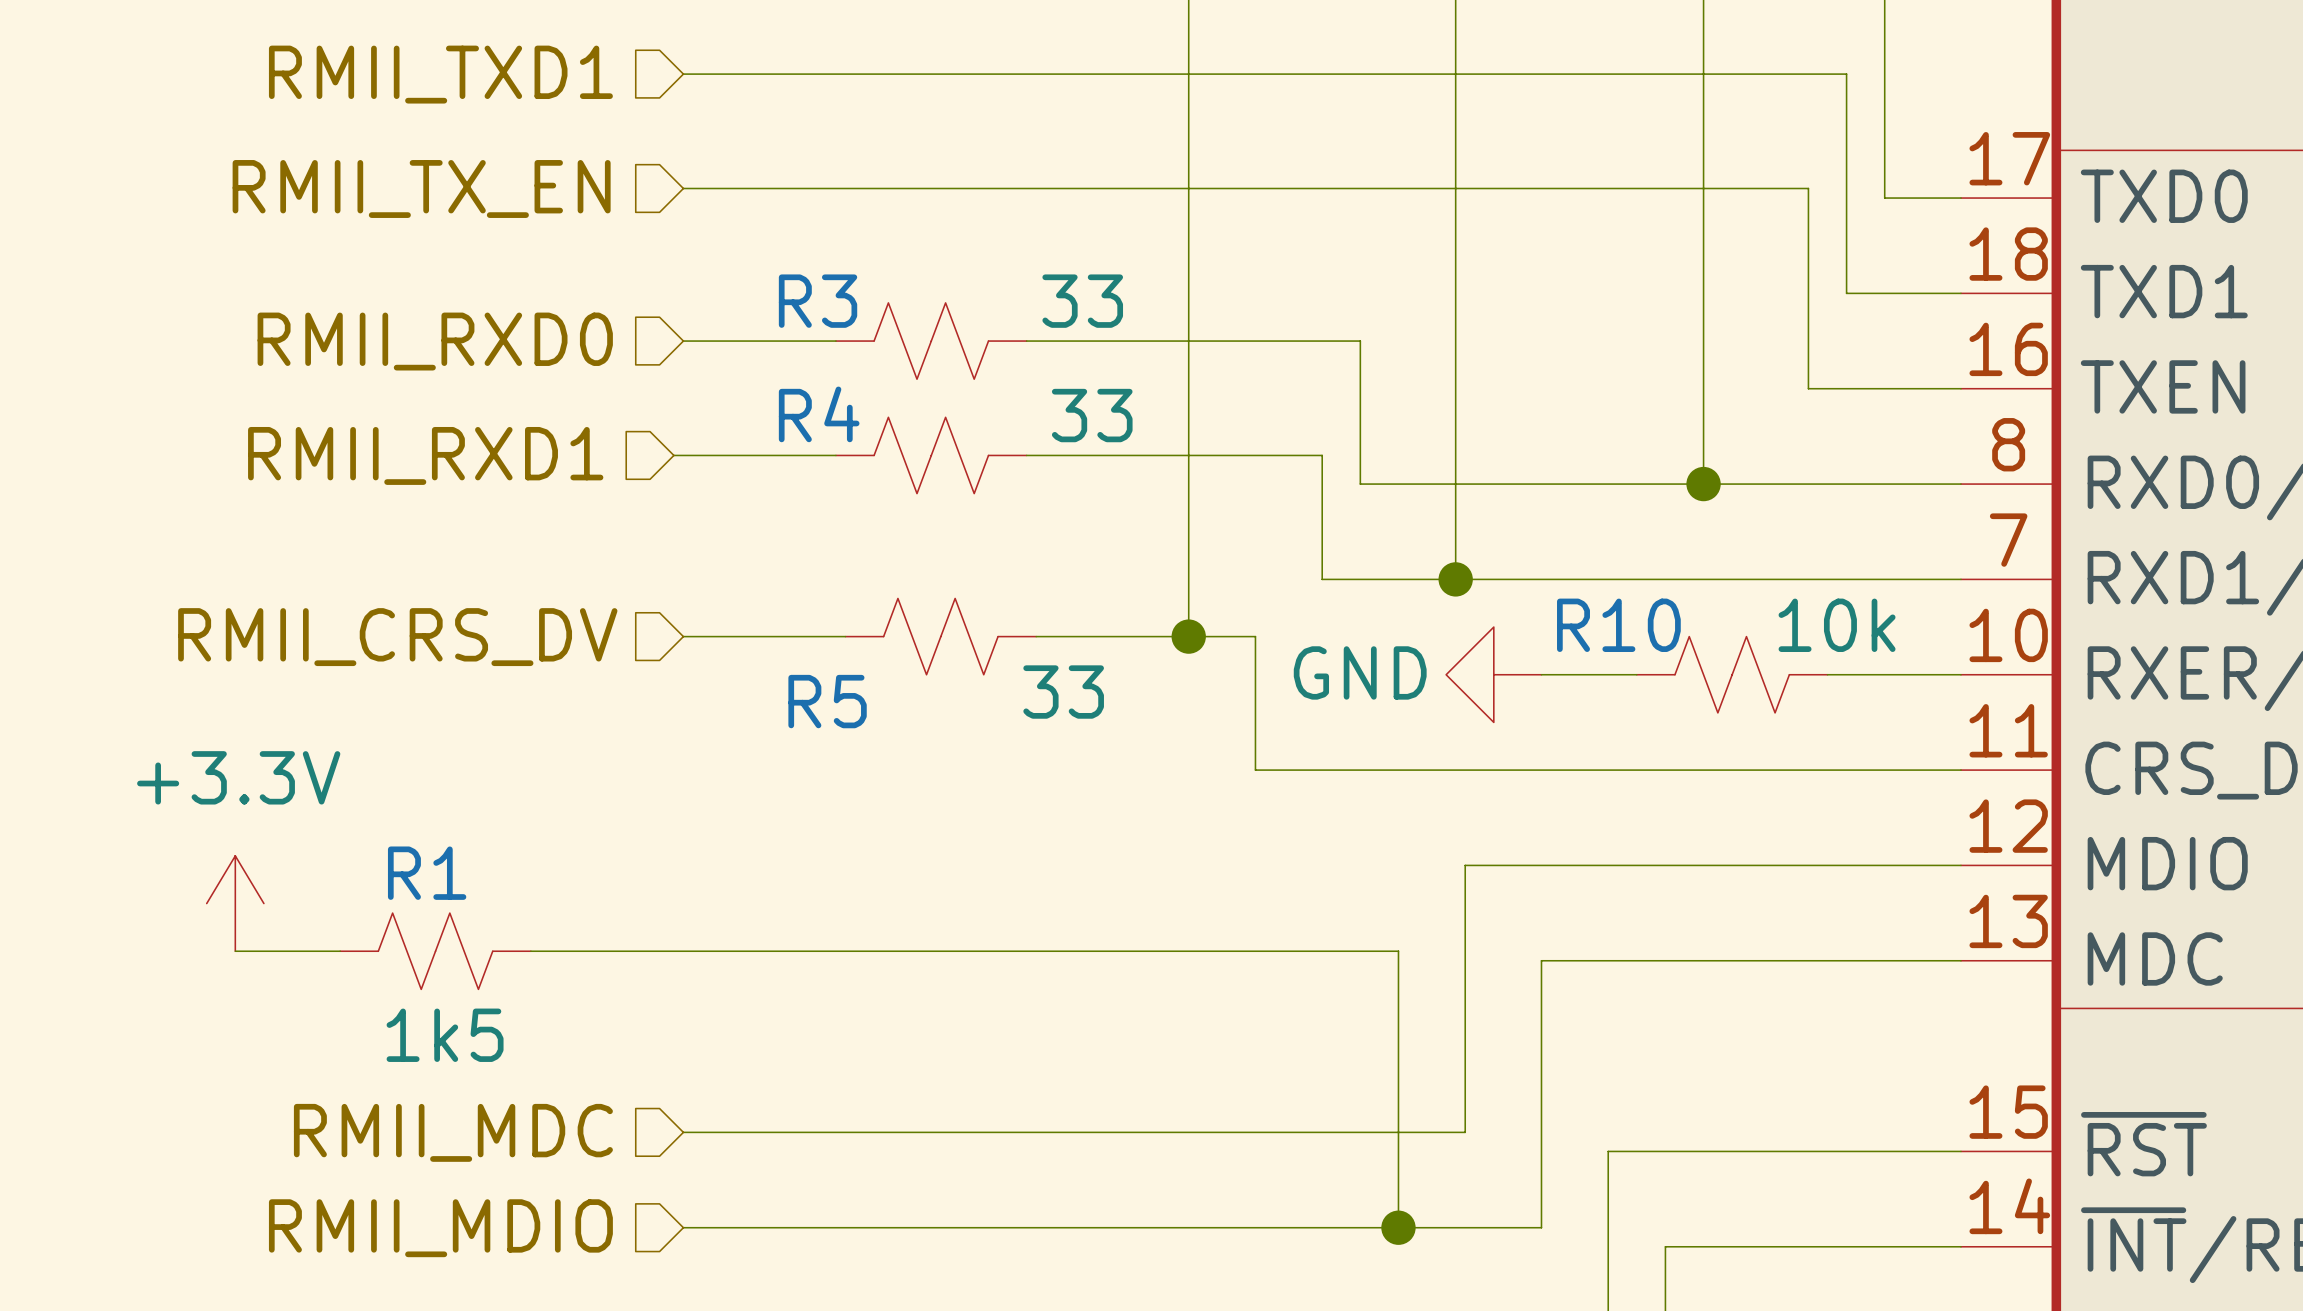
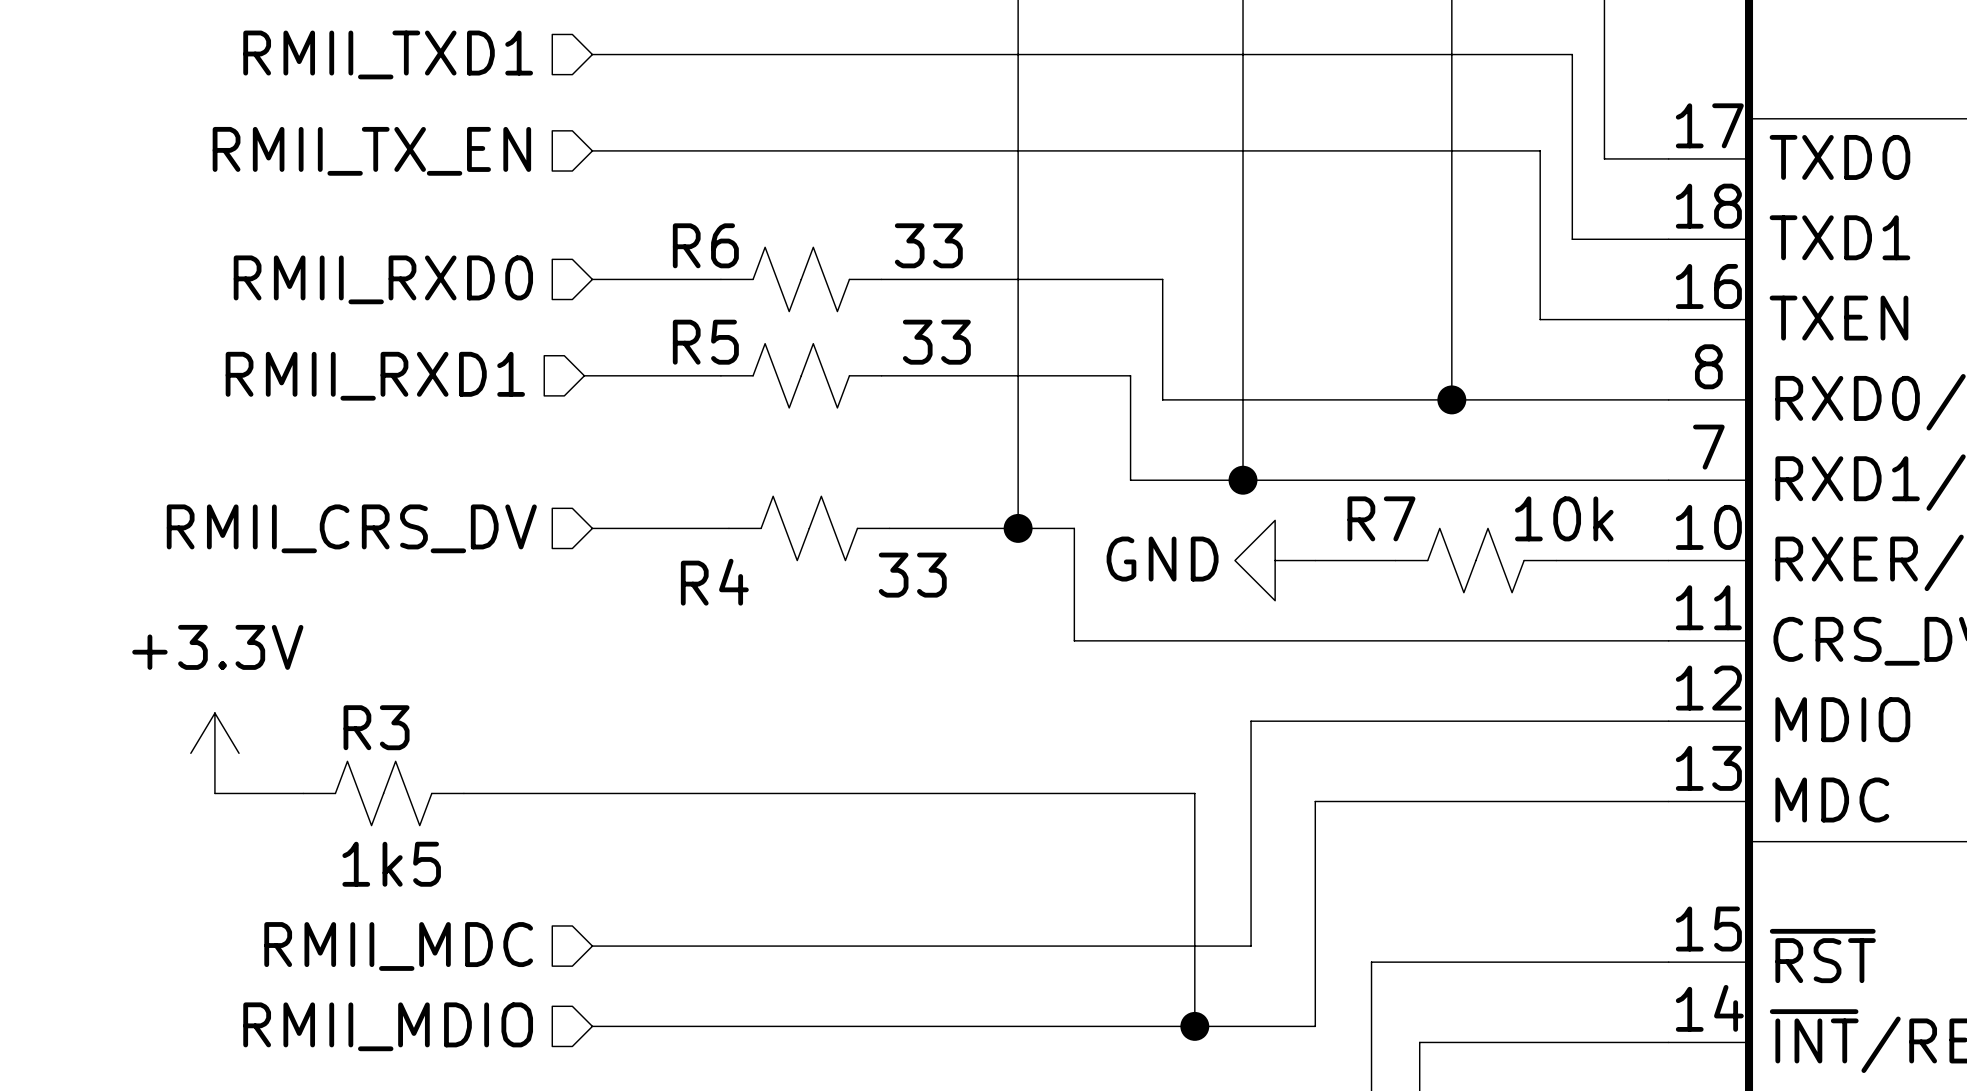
R3 name: R3 (818, 301) -> R6 (705, 245)
R4 name: R4 (819, 414) -> R5 (705, 342)
R10 name: R10 (1618, 625) -> R7 (1381, 518)
R5 name: R5 (827, 701) -> R4 (714, 582)
R1 name: R1 (427, 873) -> R3 (376, 727)

